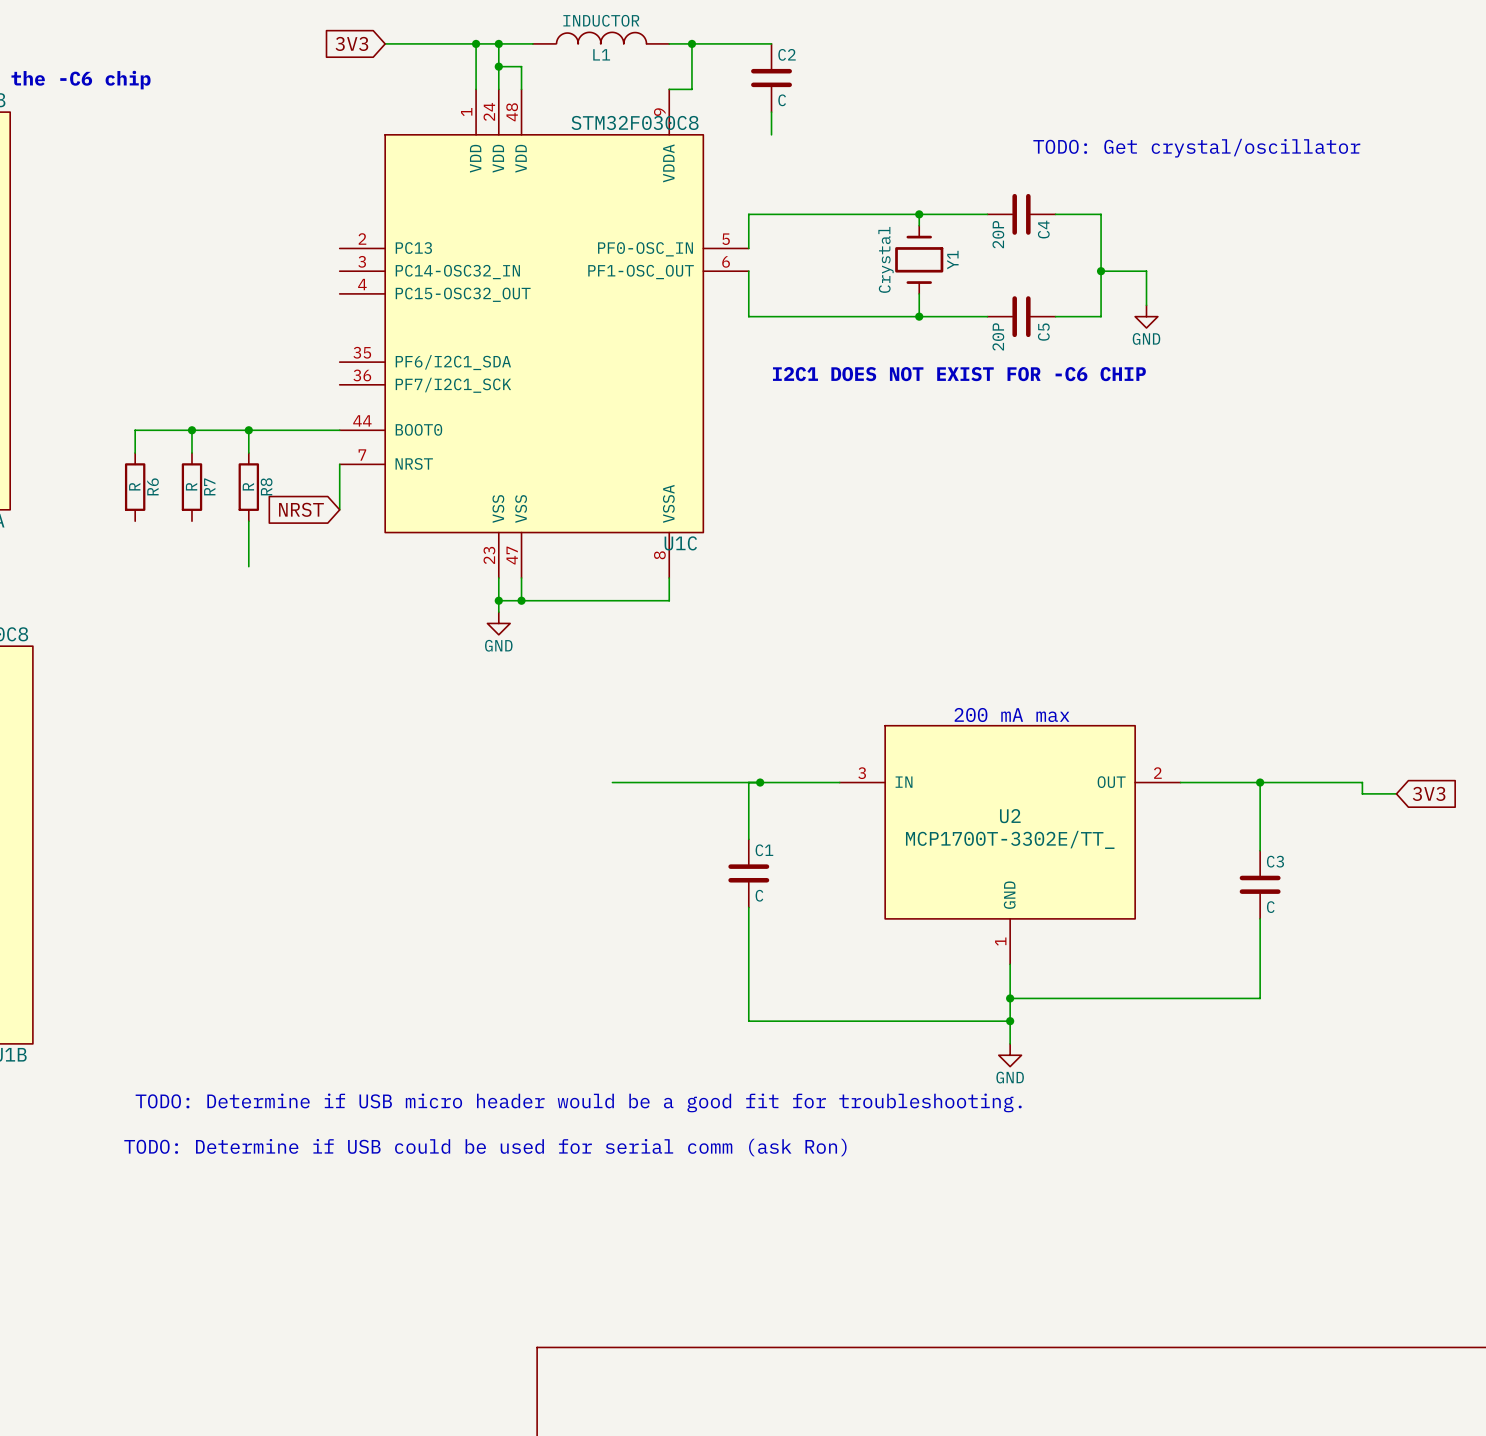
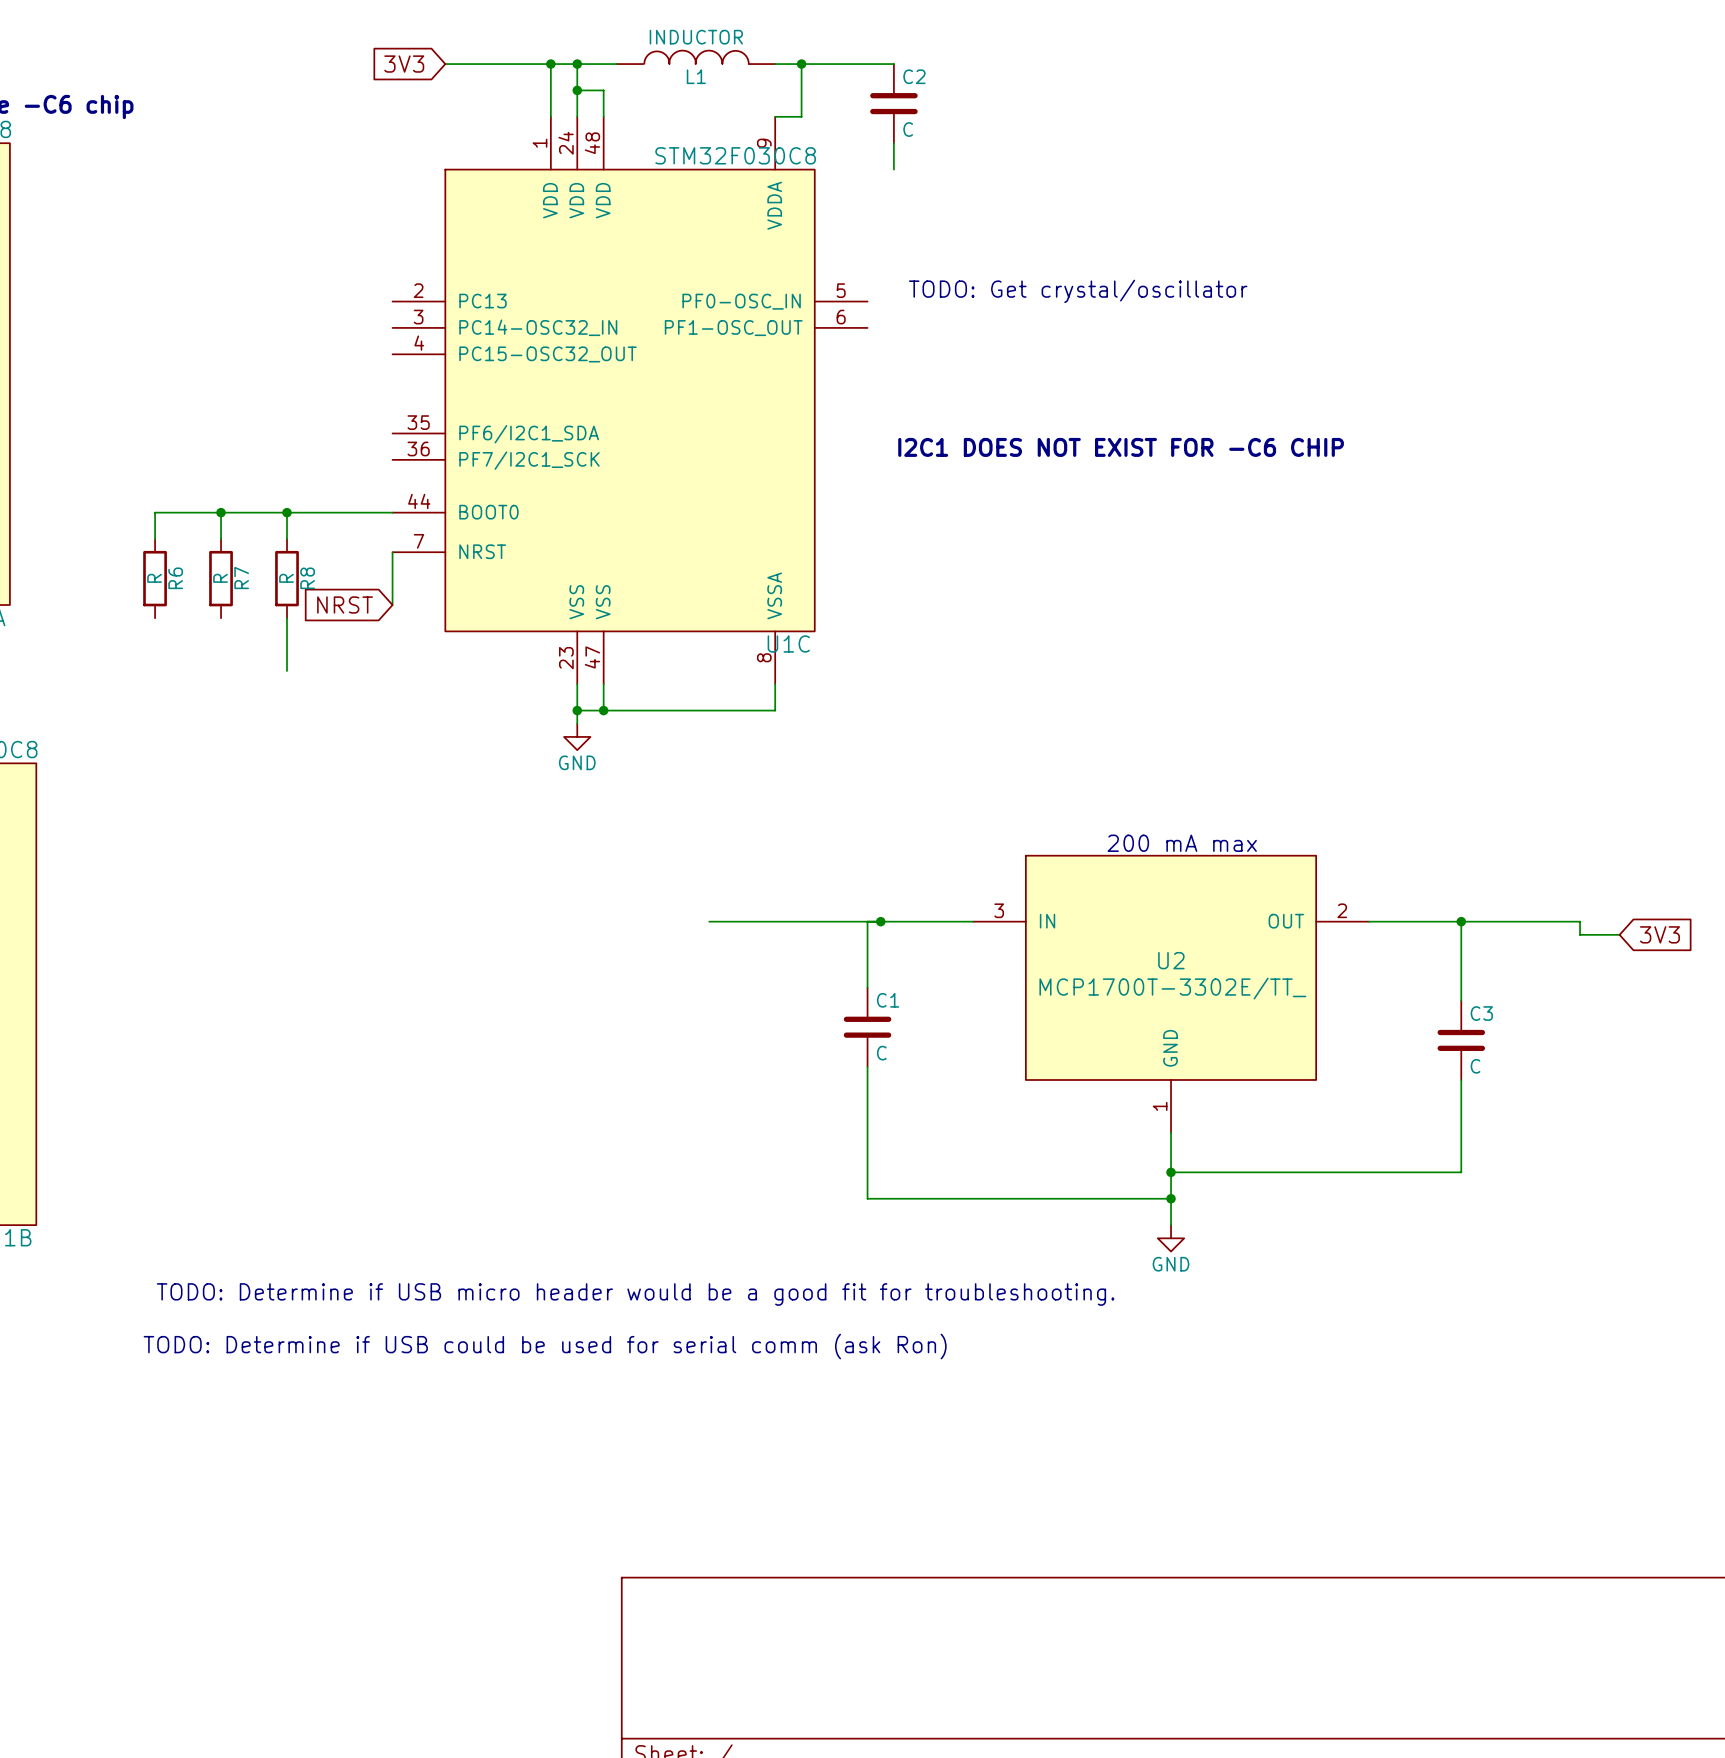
text: TODO: Get crystal/oscillator (1196, 148) -> none
wire: (919, 214) (919, 225) -> none
junction: (919, 214) -> none
wire: (987, 214) (748, 214) (748, 248) -> none
C4: 20P (1021, 214) -> none
wire: (1055, 214) (1101, 214) (1101, 316) (1055, 316) -> none
text: none -> TODO: Get crystal/oscillator (1078, 291)
Y1: Crystal (919, 259) -> none
wire: (748, 271) (748, 316) (987, 316) -> none
wire: (1101, 271) (1146, 271) (1146, 305) -> none
junction: (1101, 271) -> none
wire: (919, 293) (919, 316) -> none
junction: (919, 316) -> none
C5: 20P (1021, 316) -> none
power symbol: GND (1146, 316) -> none

